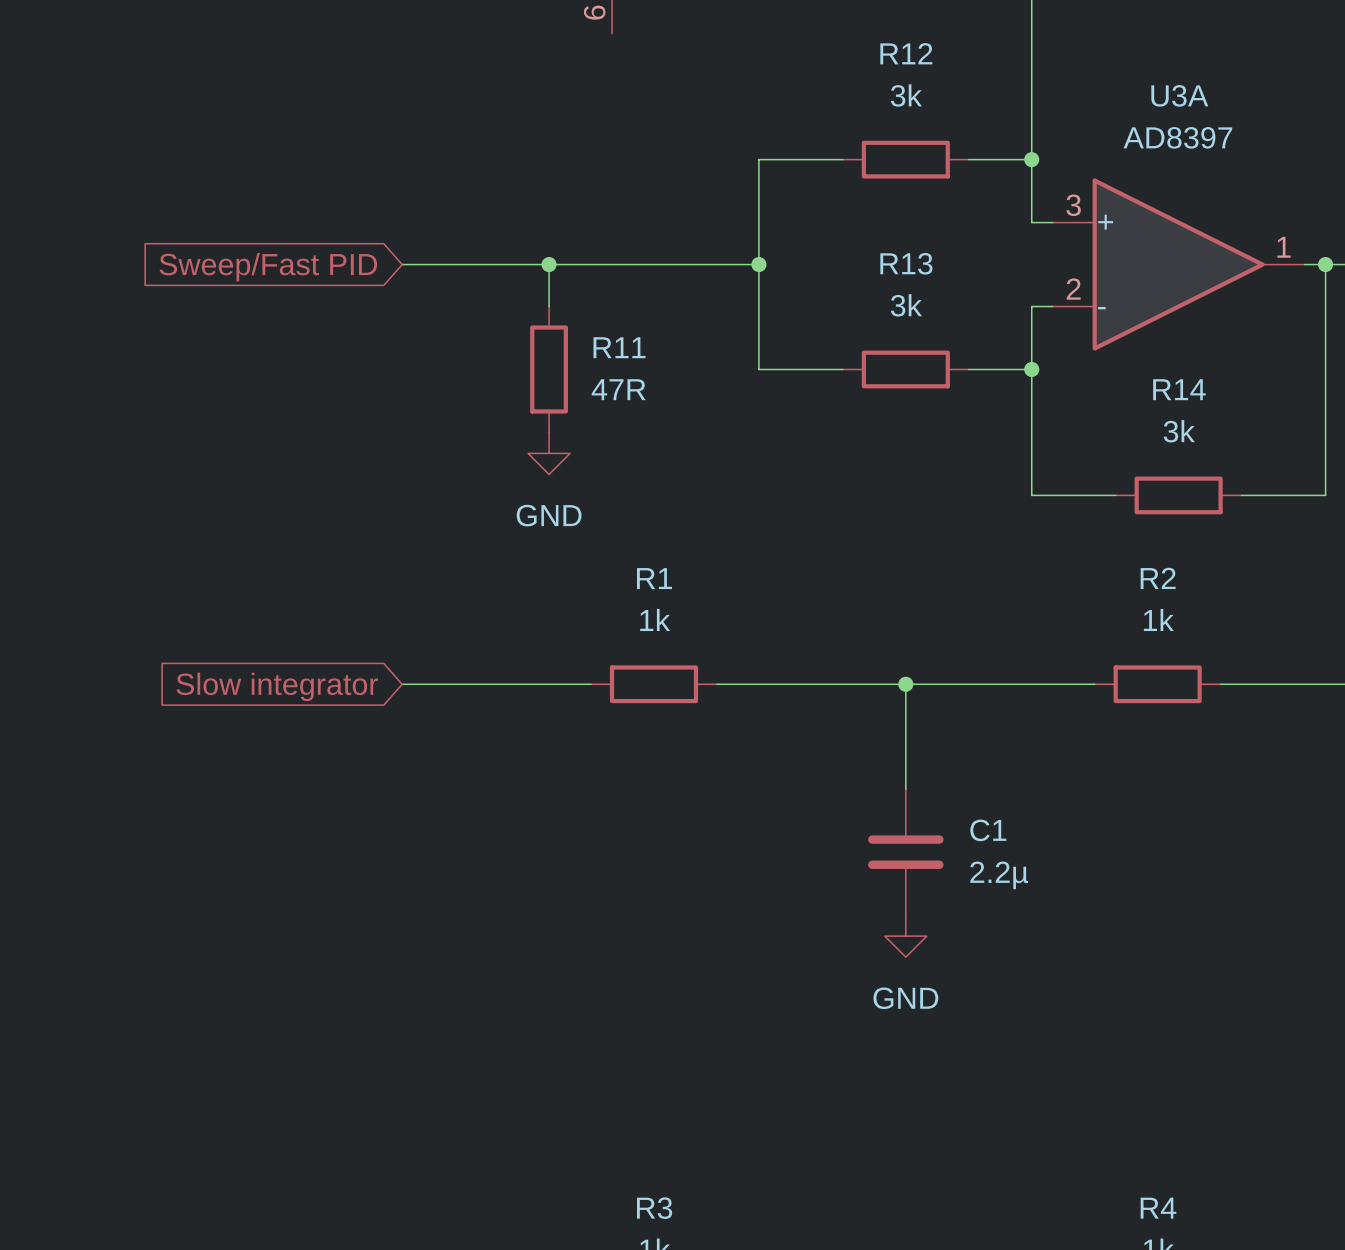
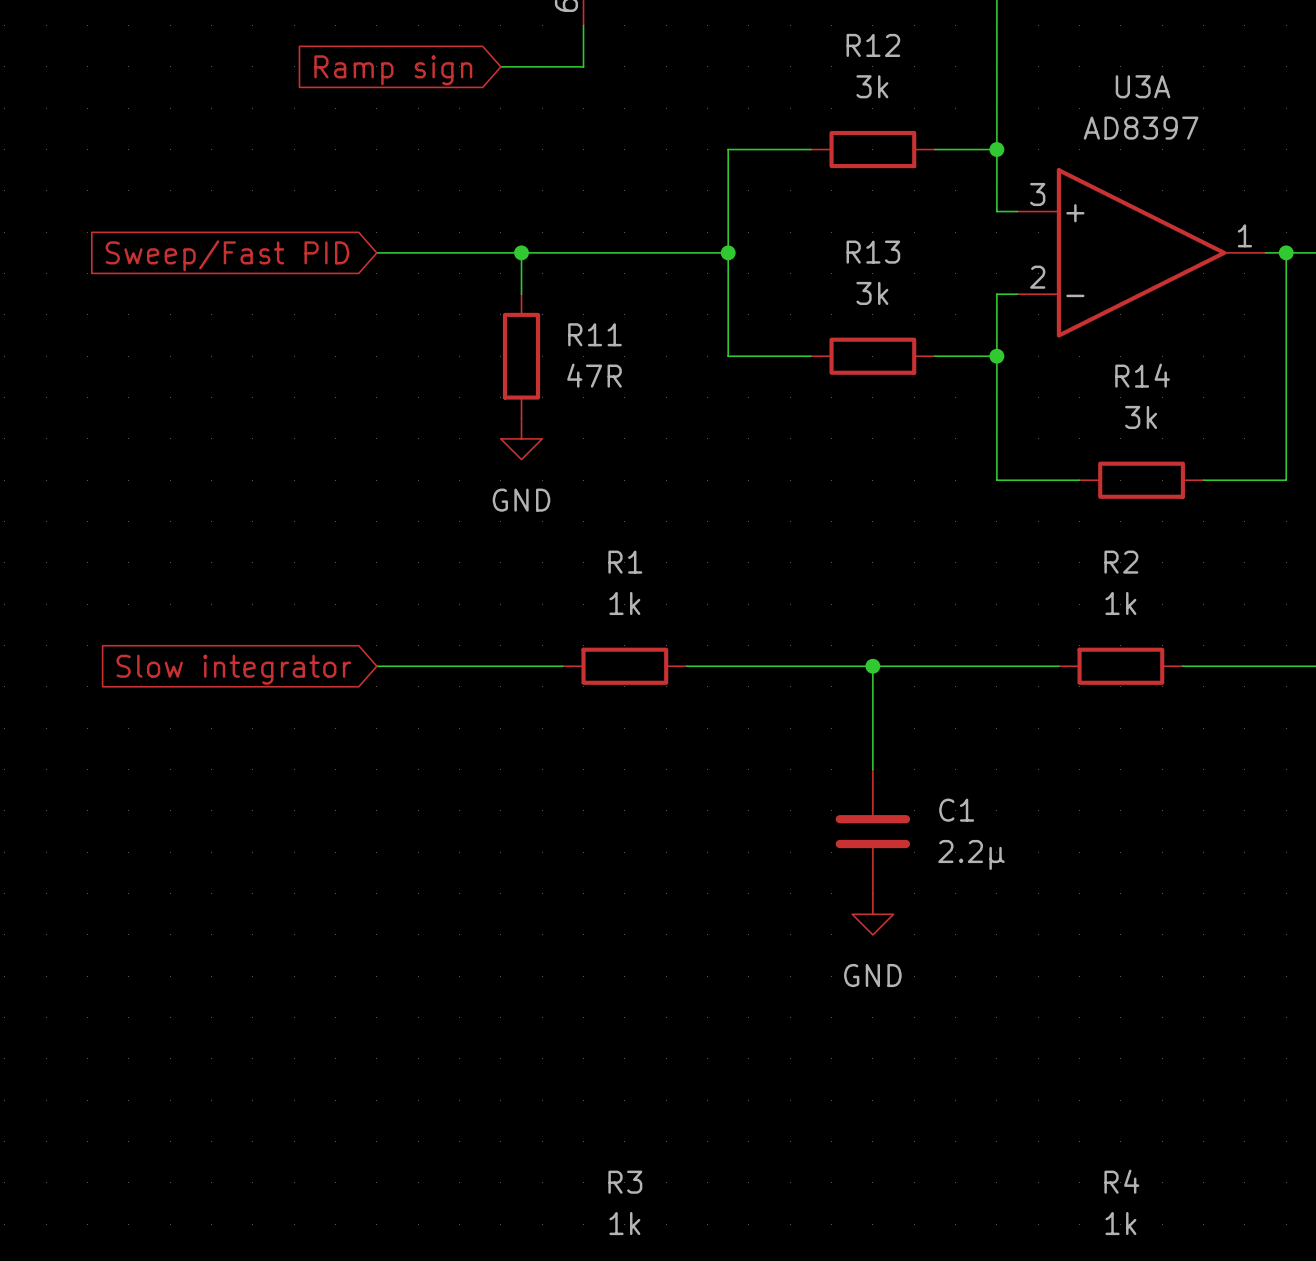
wire: none -> (583, 25) (583, 66) (500, 66)
global label: none -> Ramp sign (393, 70)

